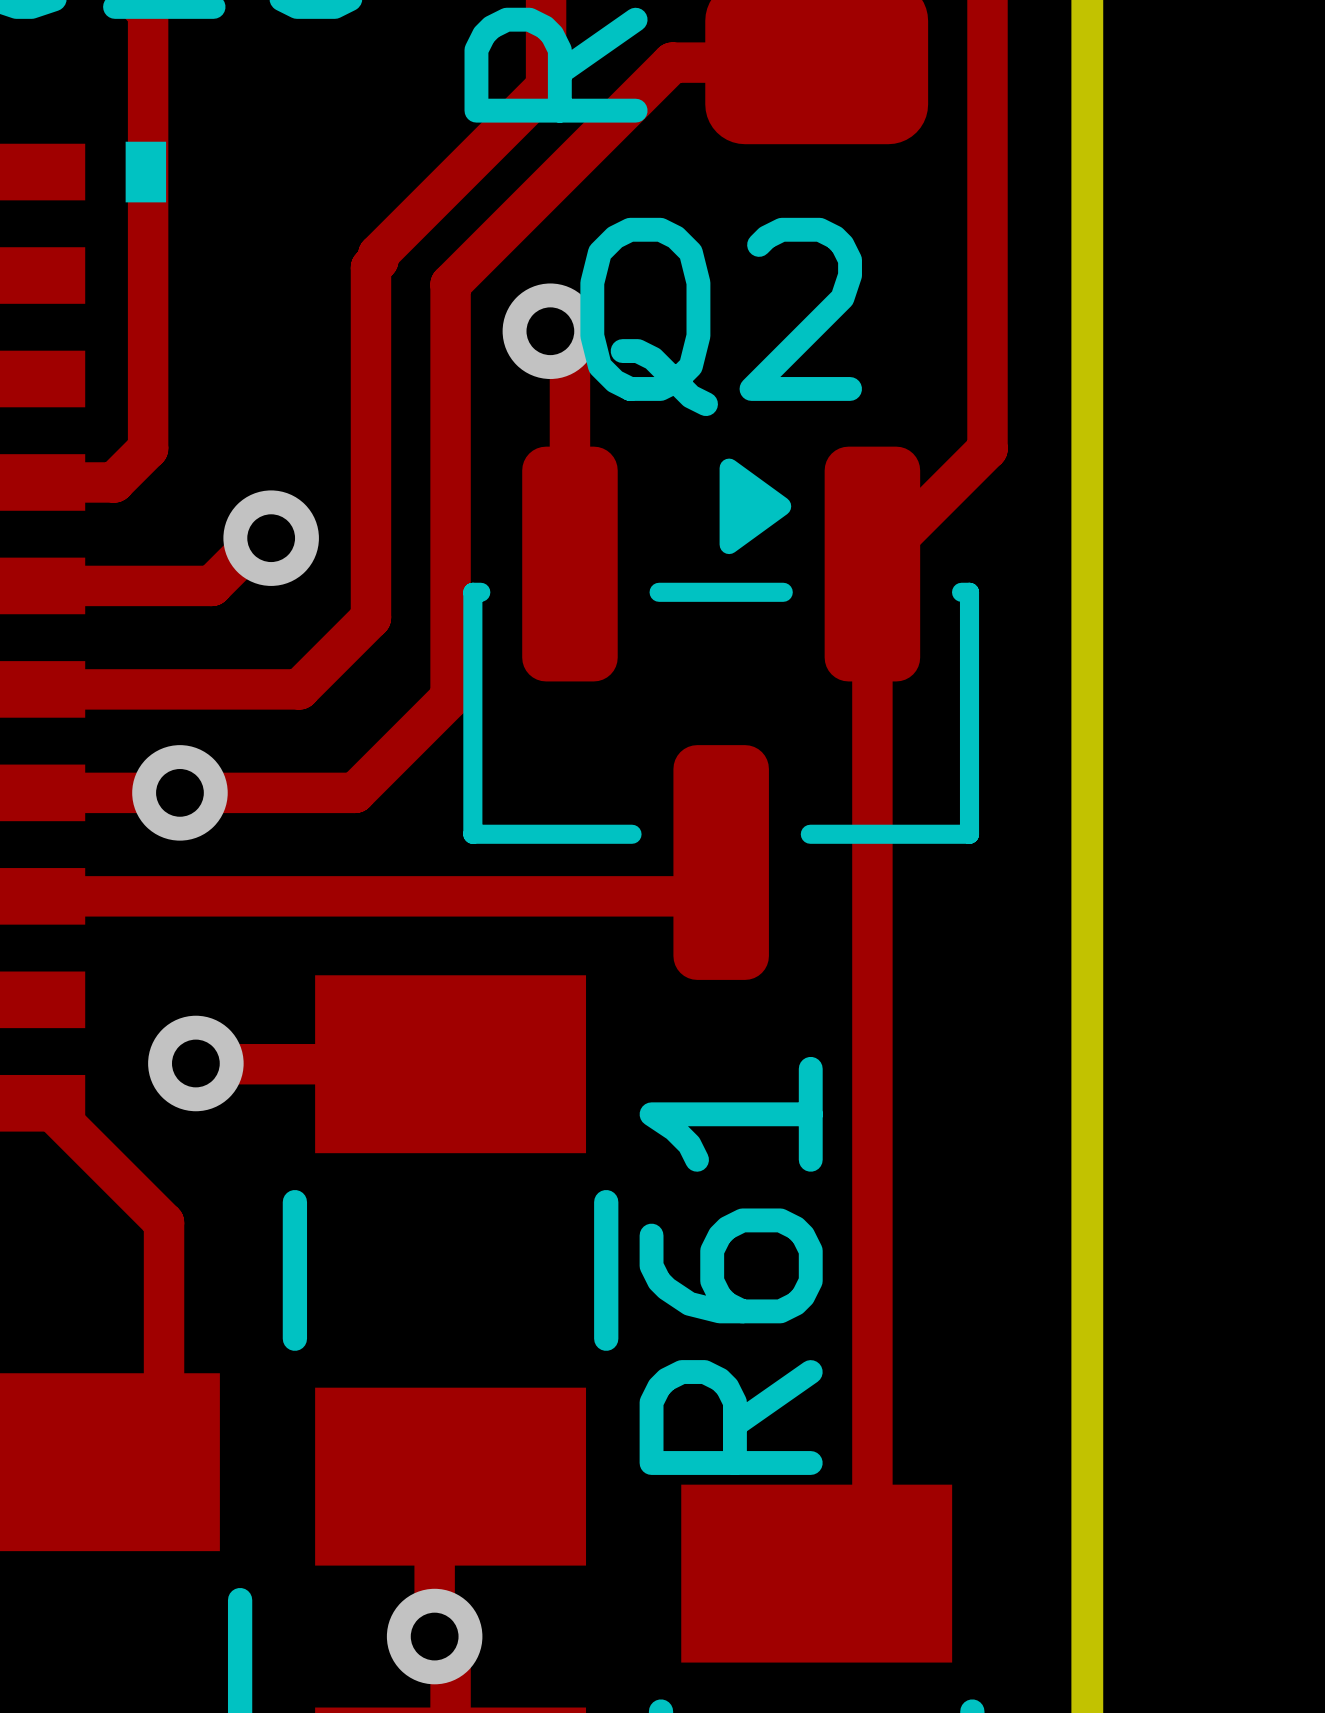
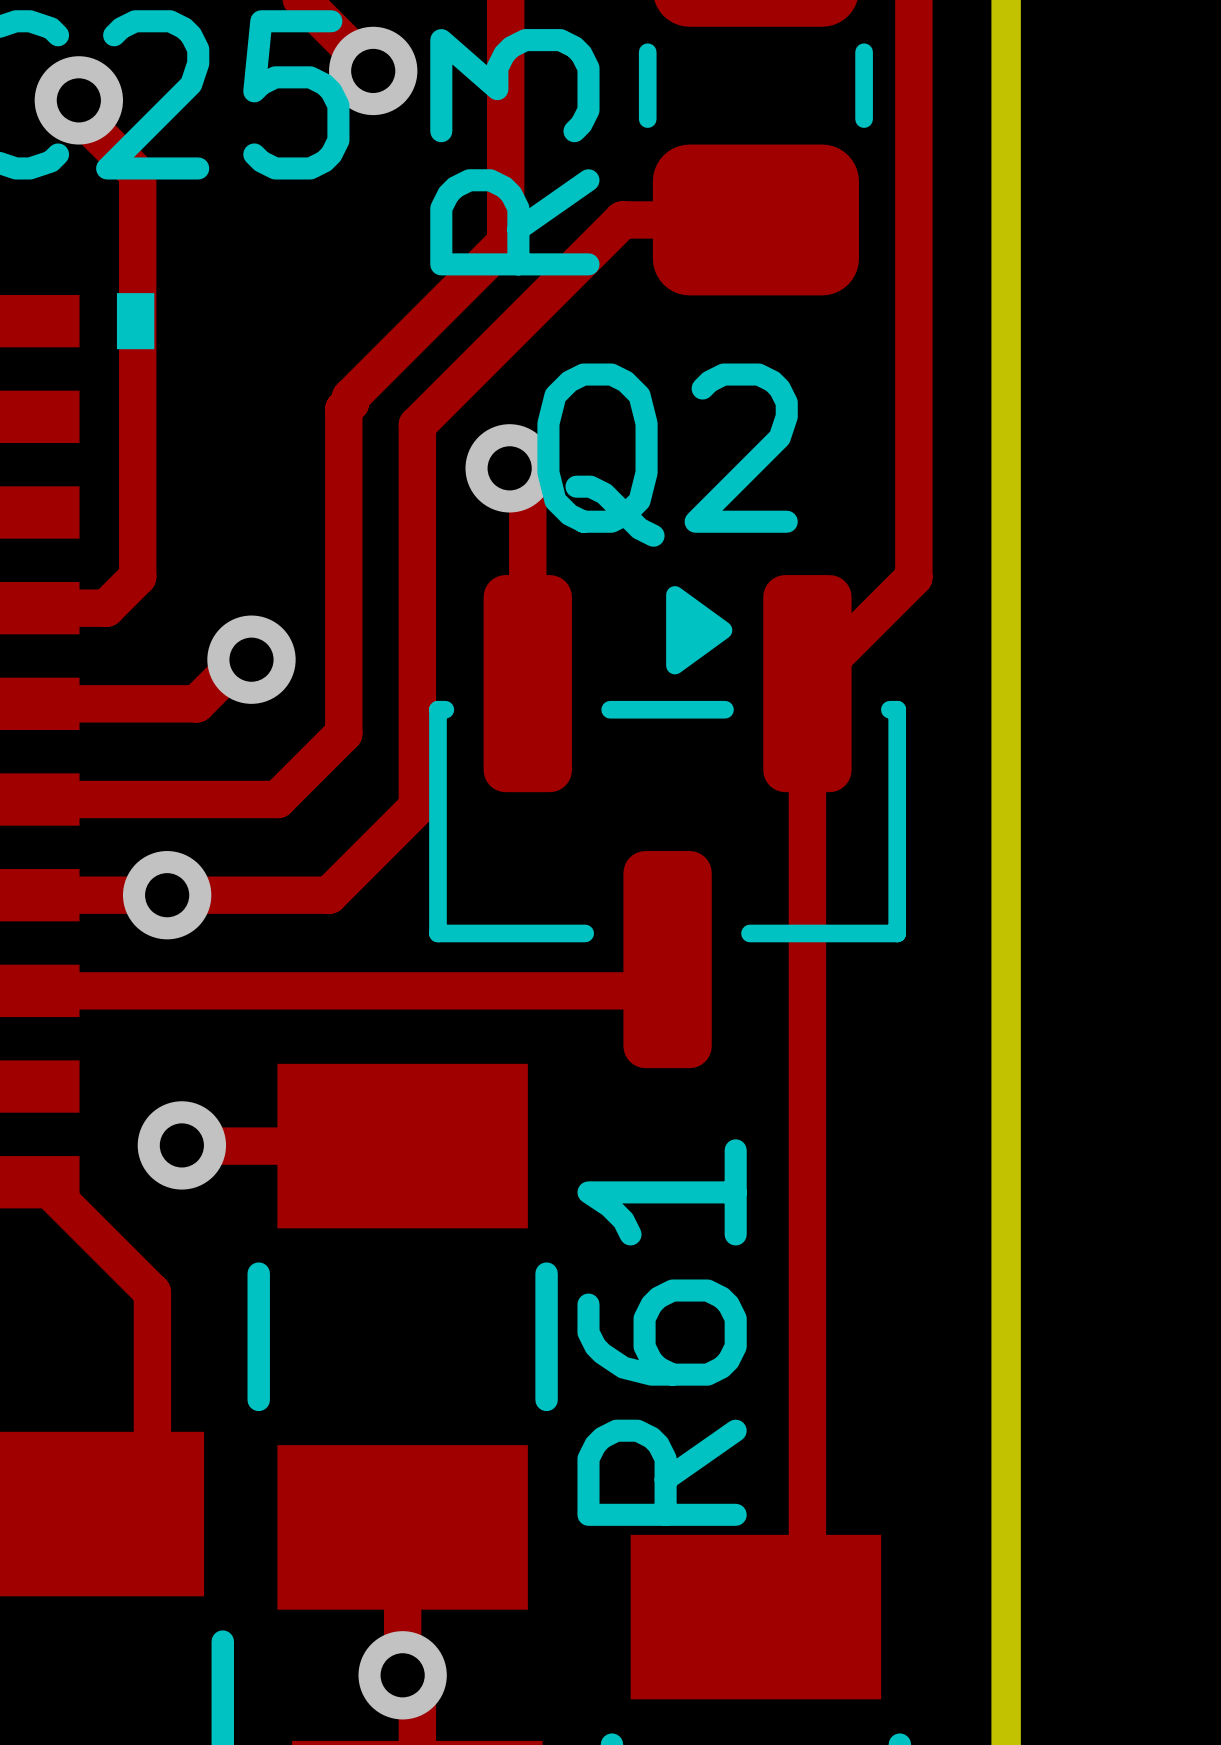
R61 position: (450, 1270) -> (402, 1336)

